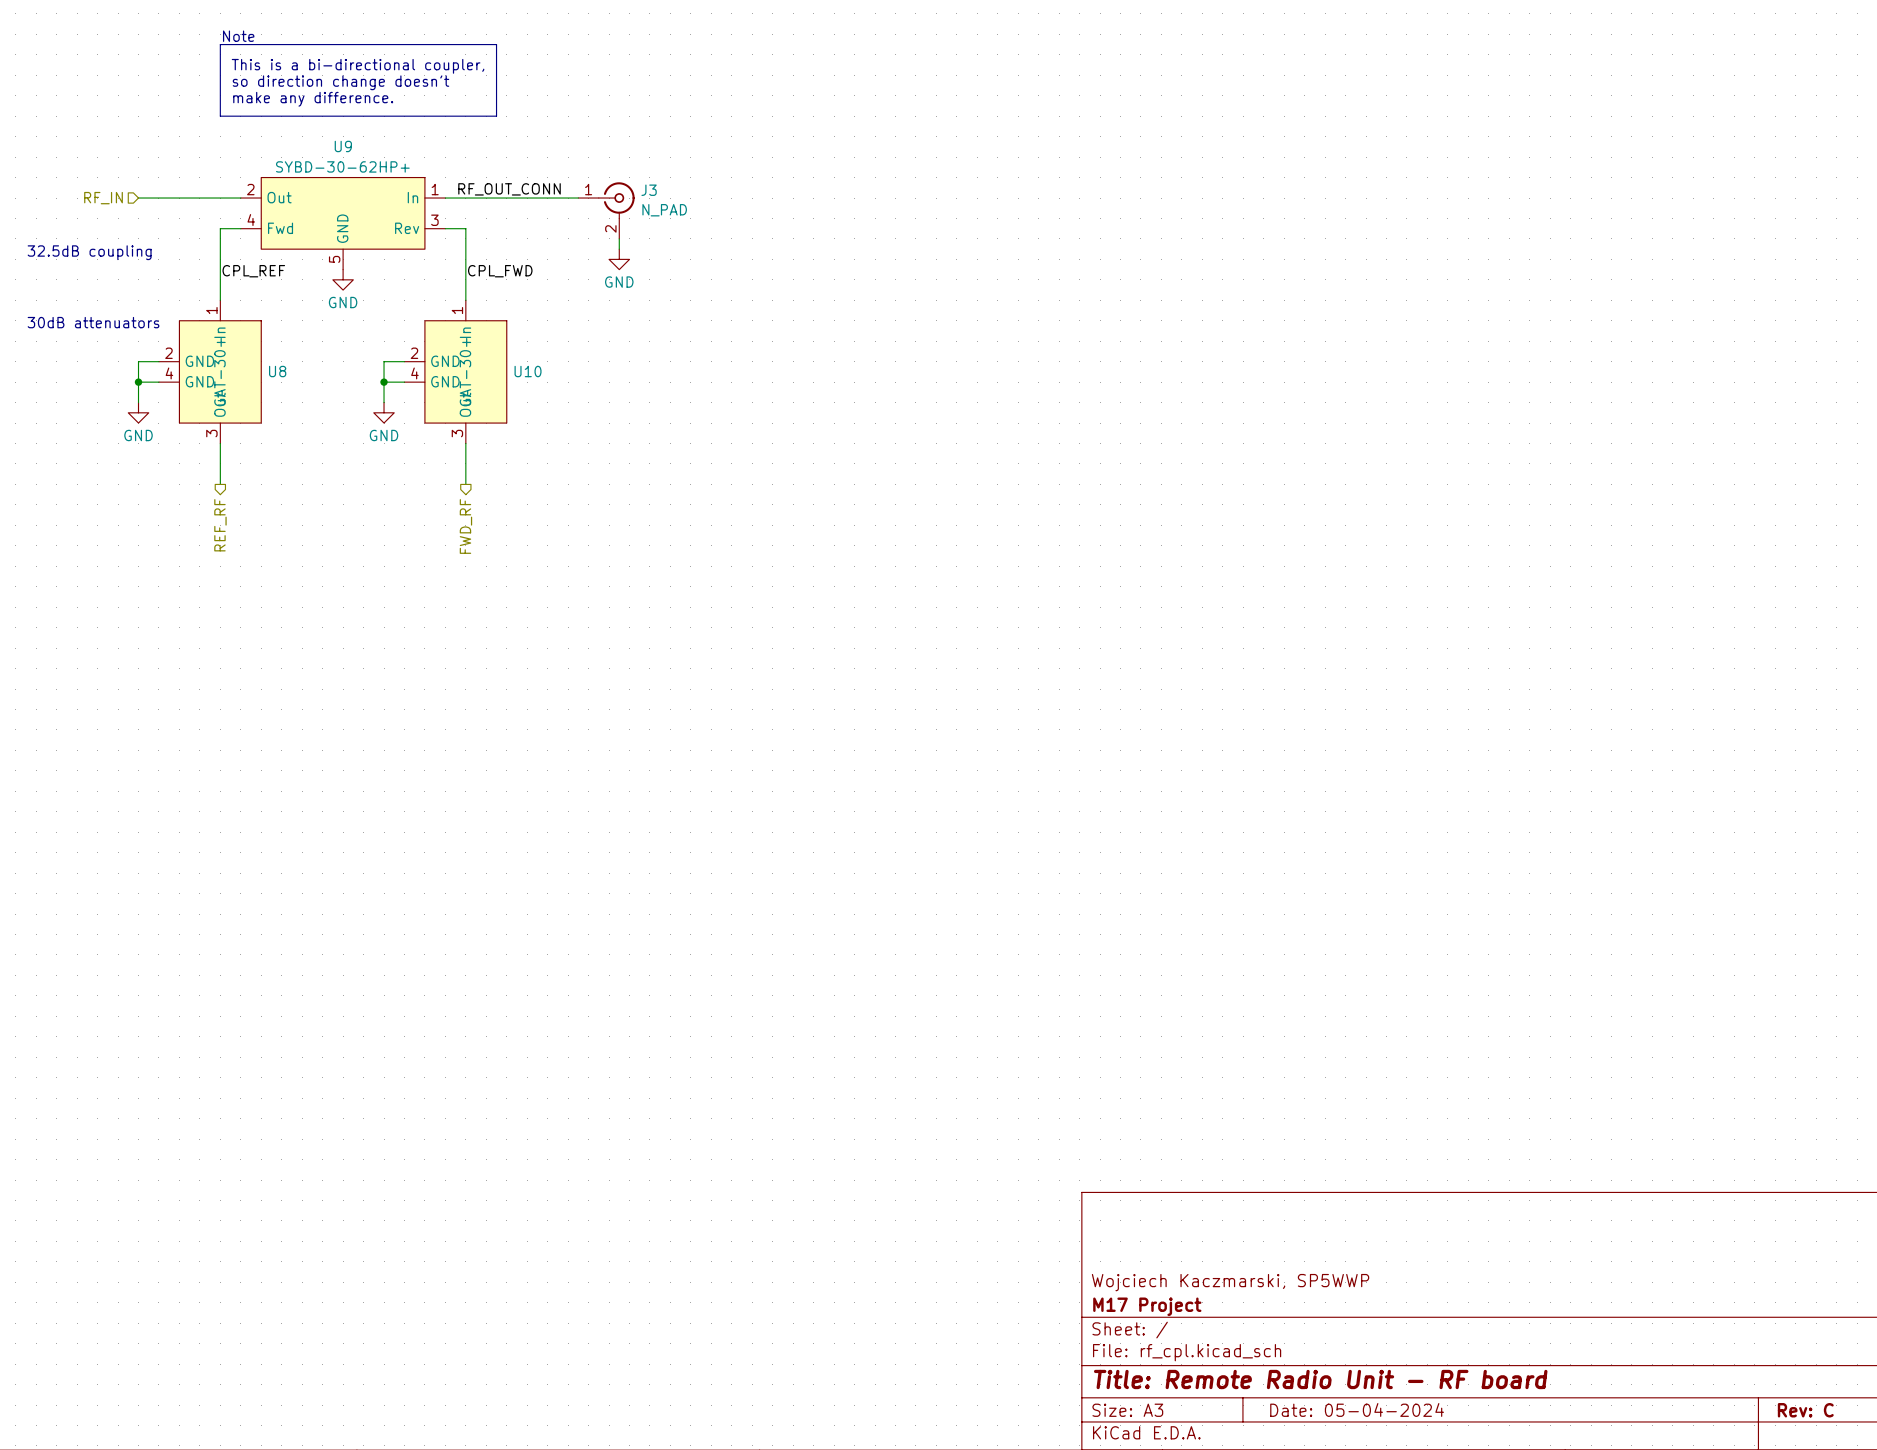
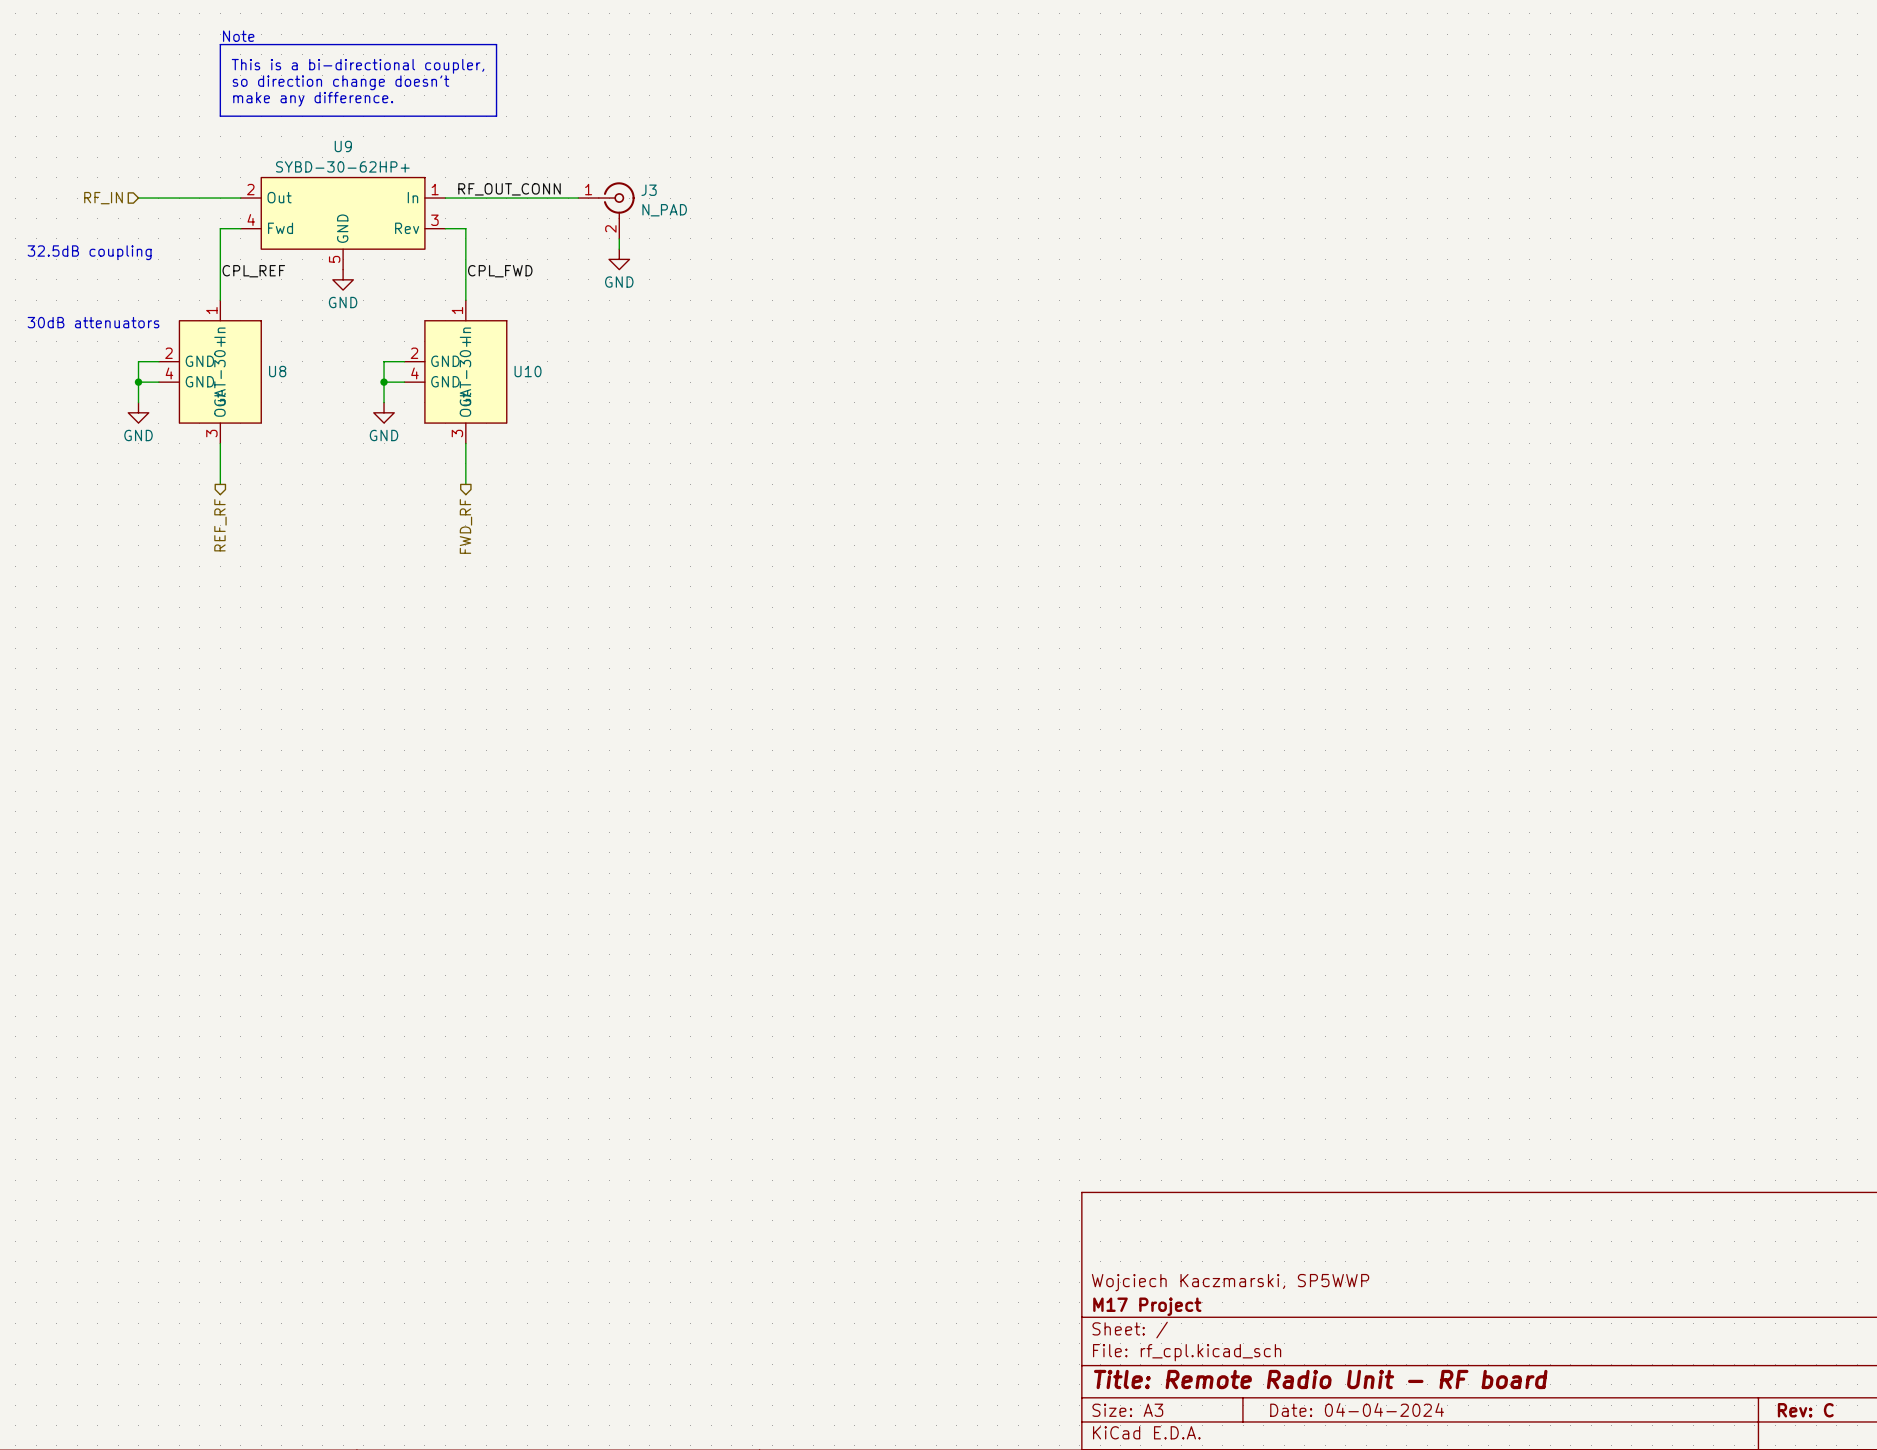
title block: Date: 05-04-2024 (1357, 1409) -> Date: 04-04-2024 (1357, 1409)

